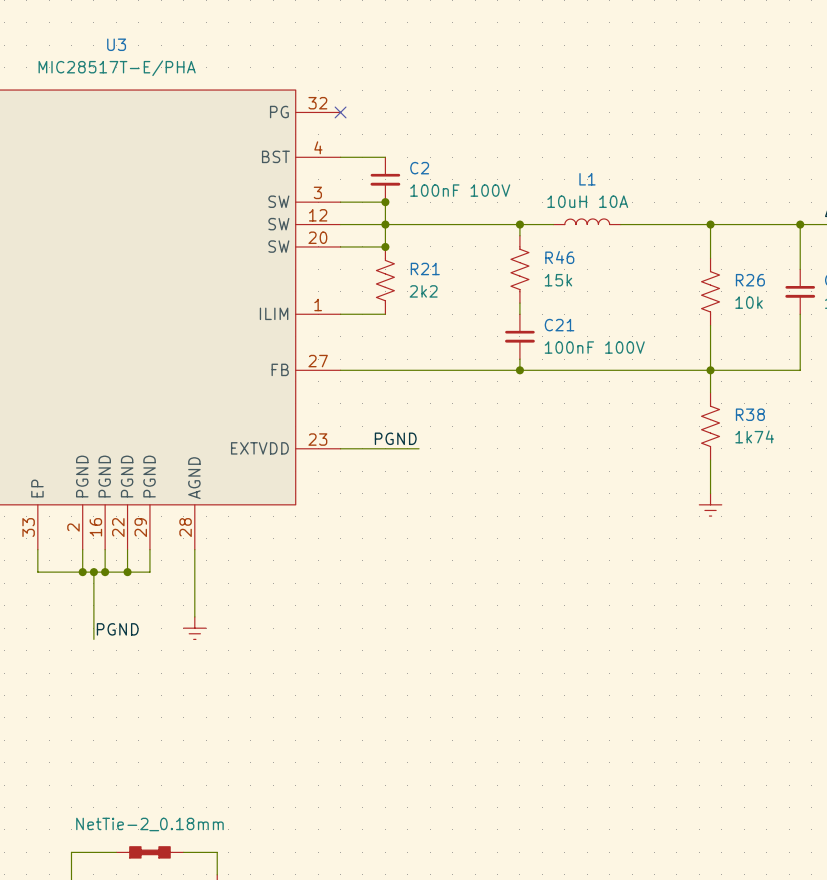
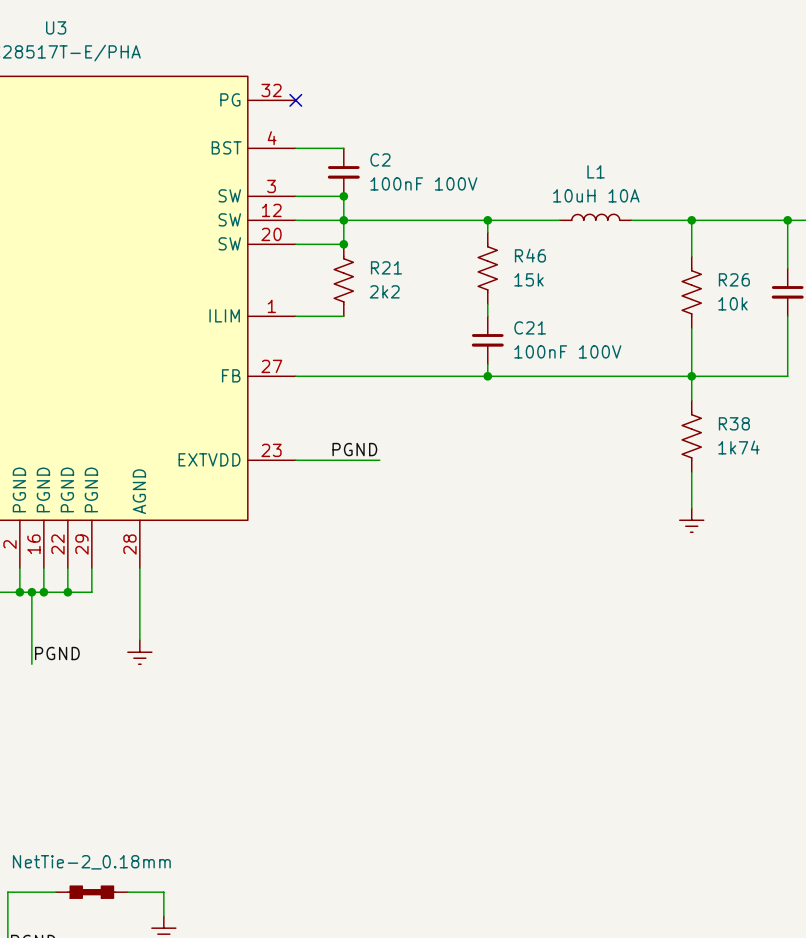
L1 position: (587, 221) -> (595, 217)
wire: (620, 224) (654, 224) -> (523, 220) (559, 220)

